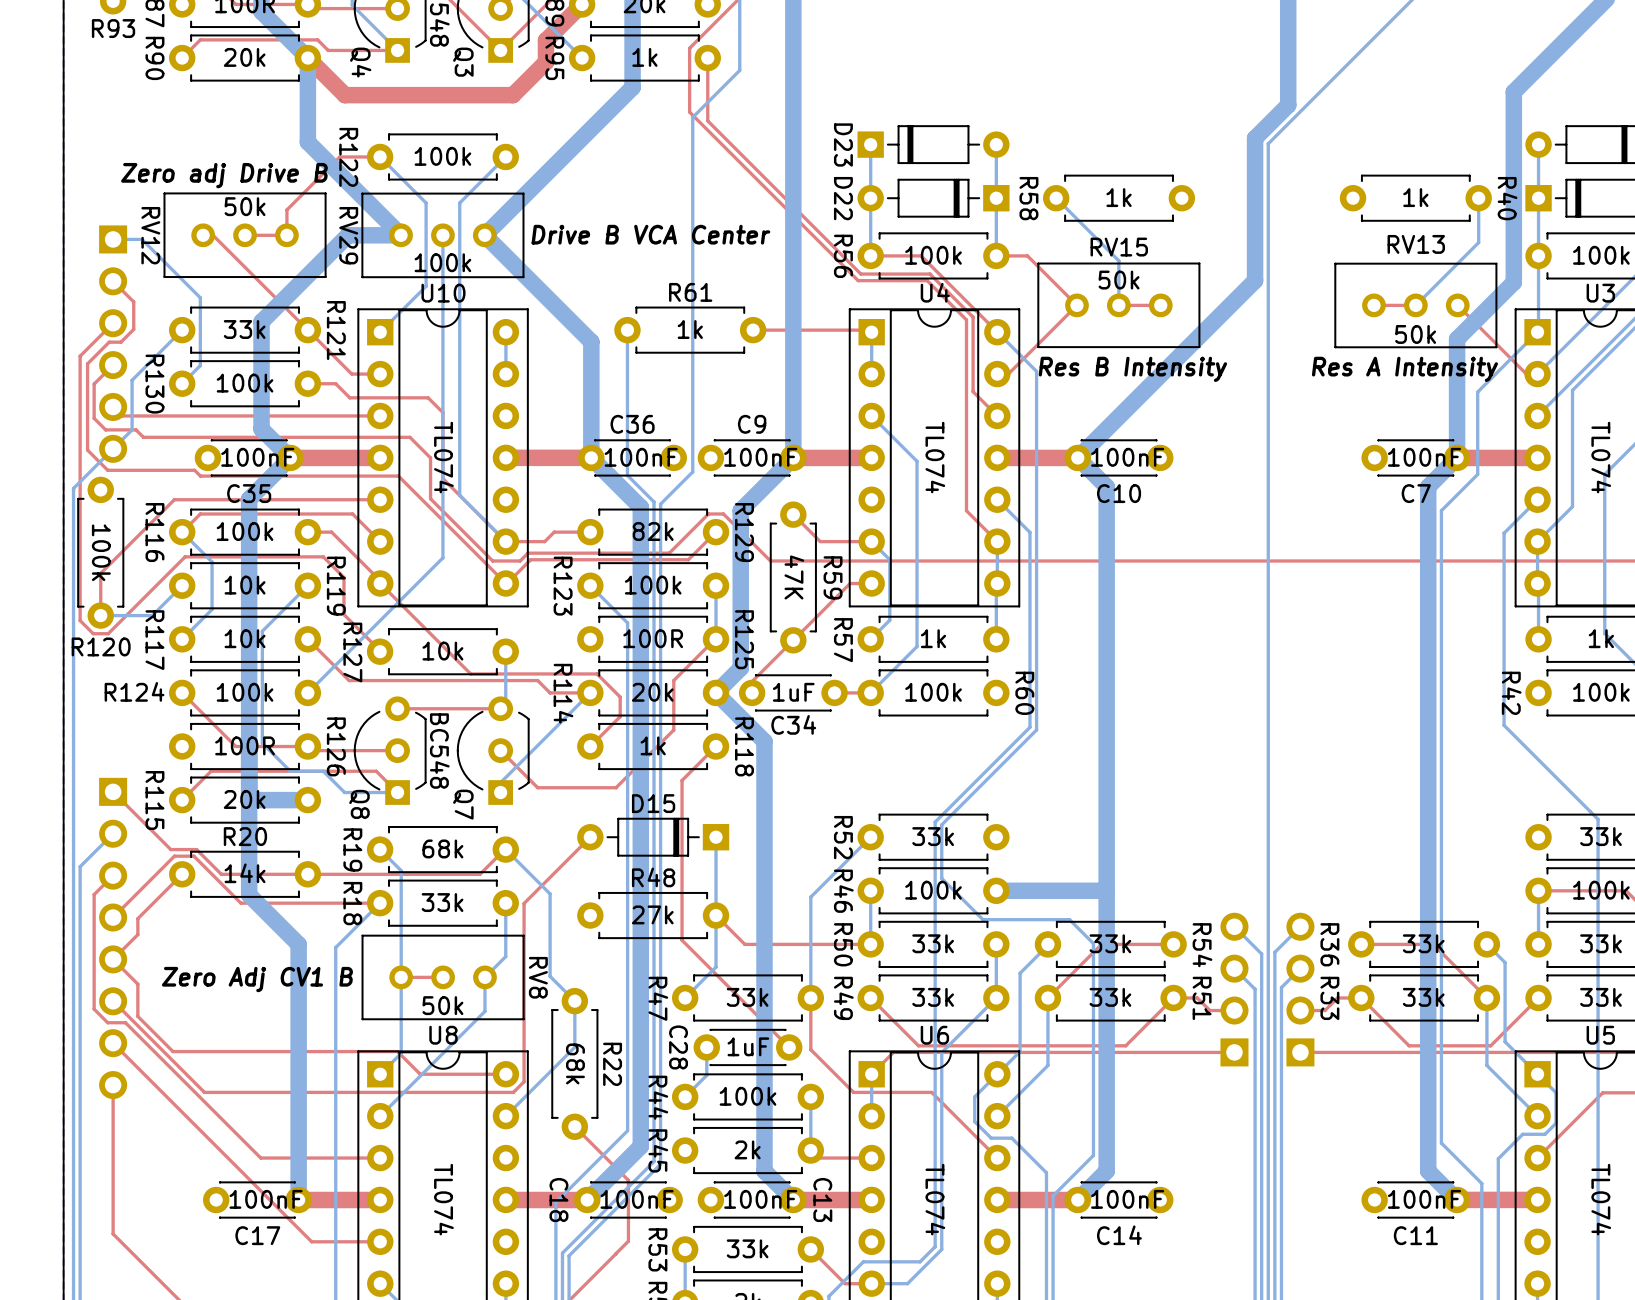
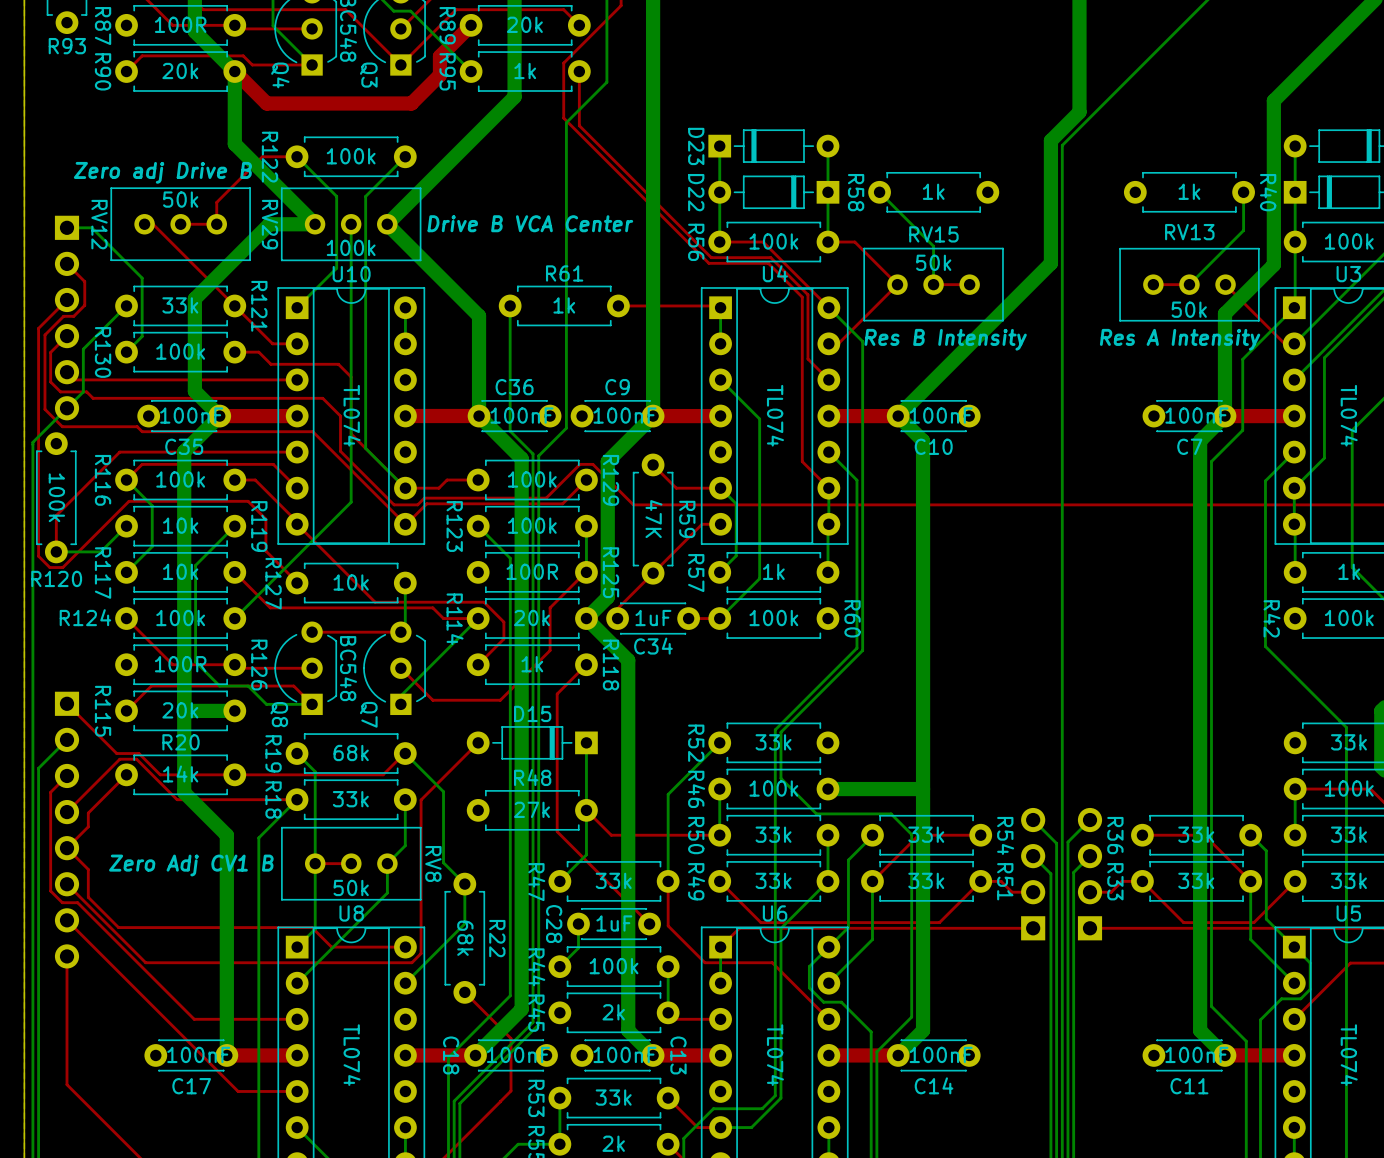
R129 value: 82k (653, 531) -> 100k (532, 479)

